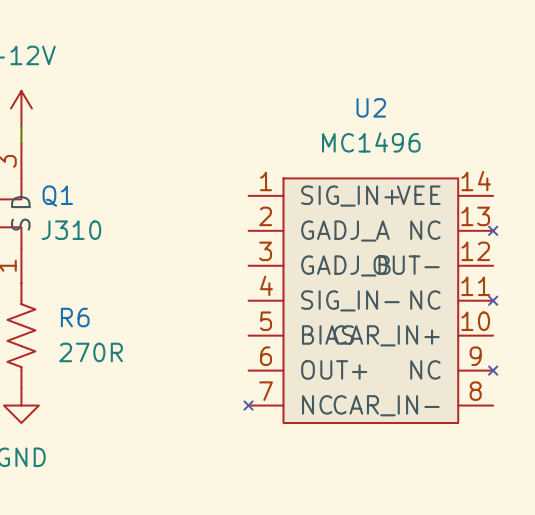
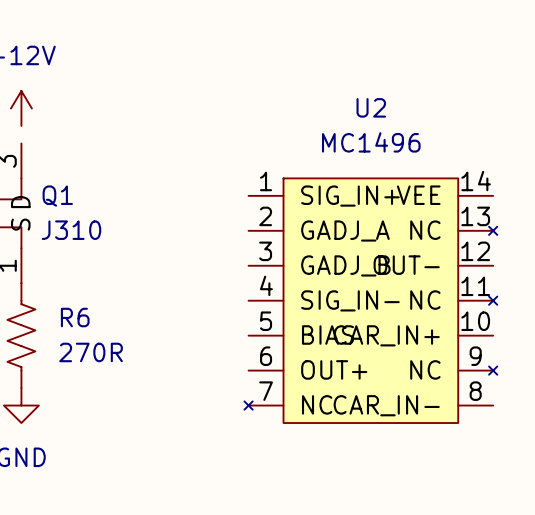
wire: (21, 125) (21, 143) -> none

